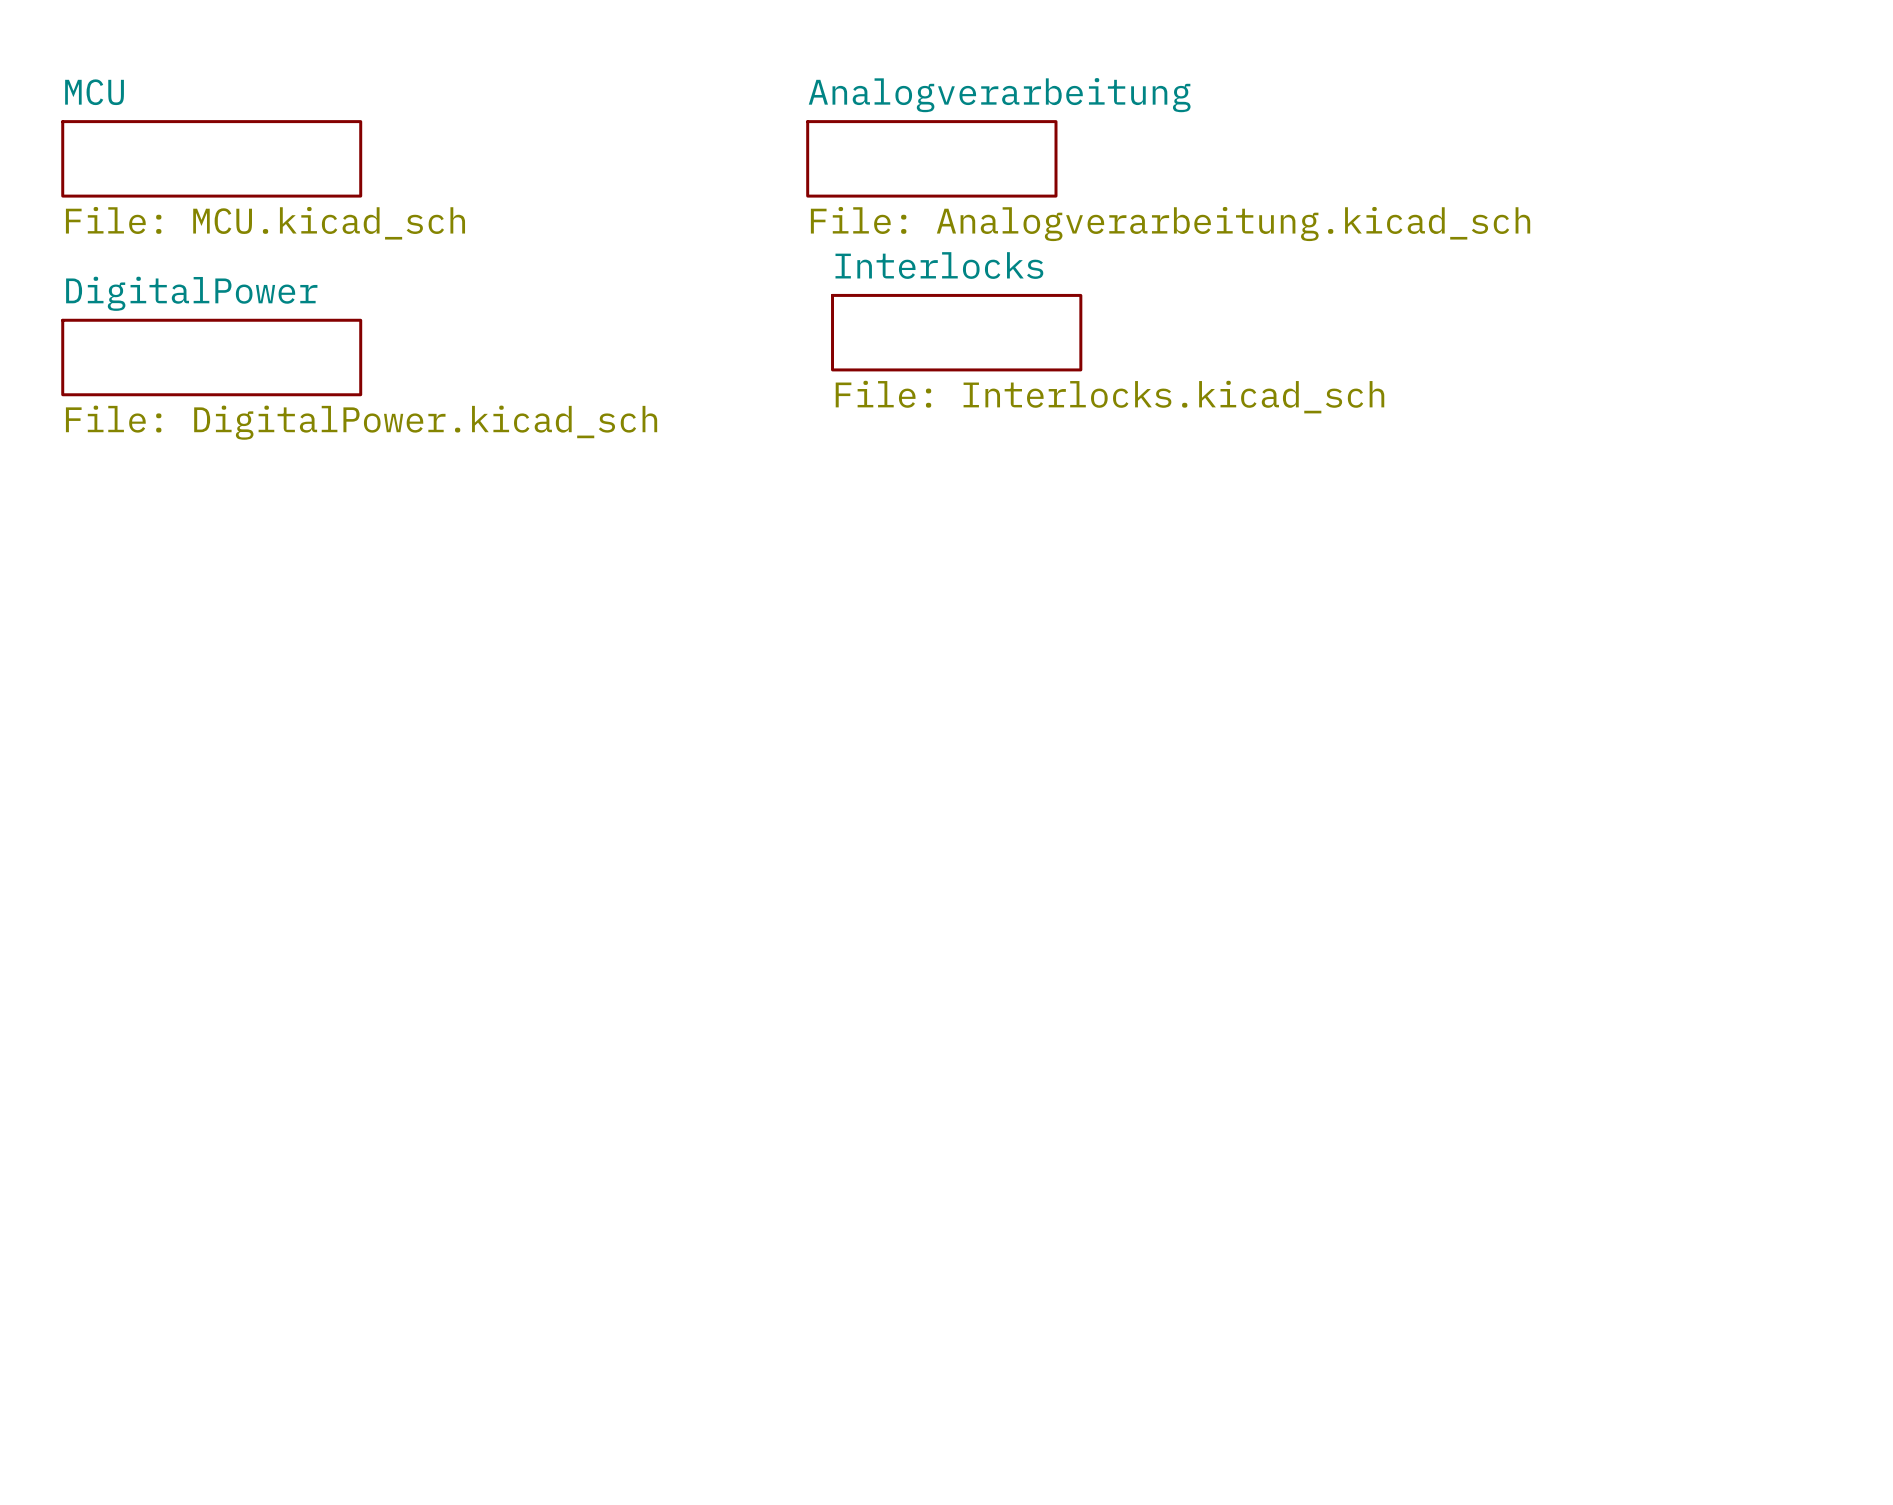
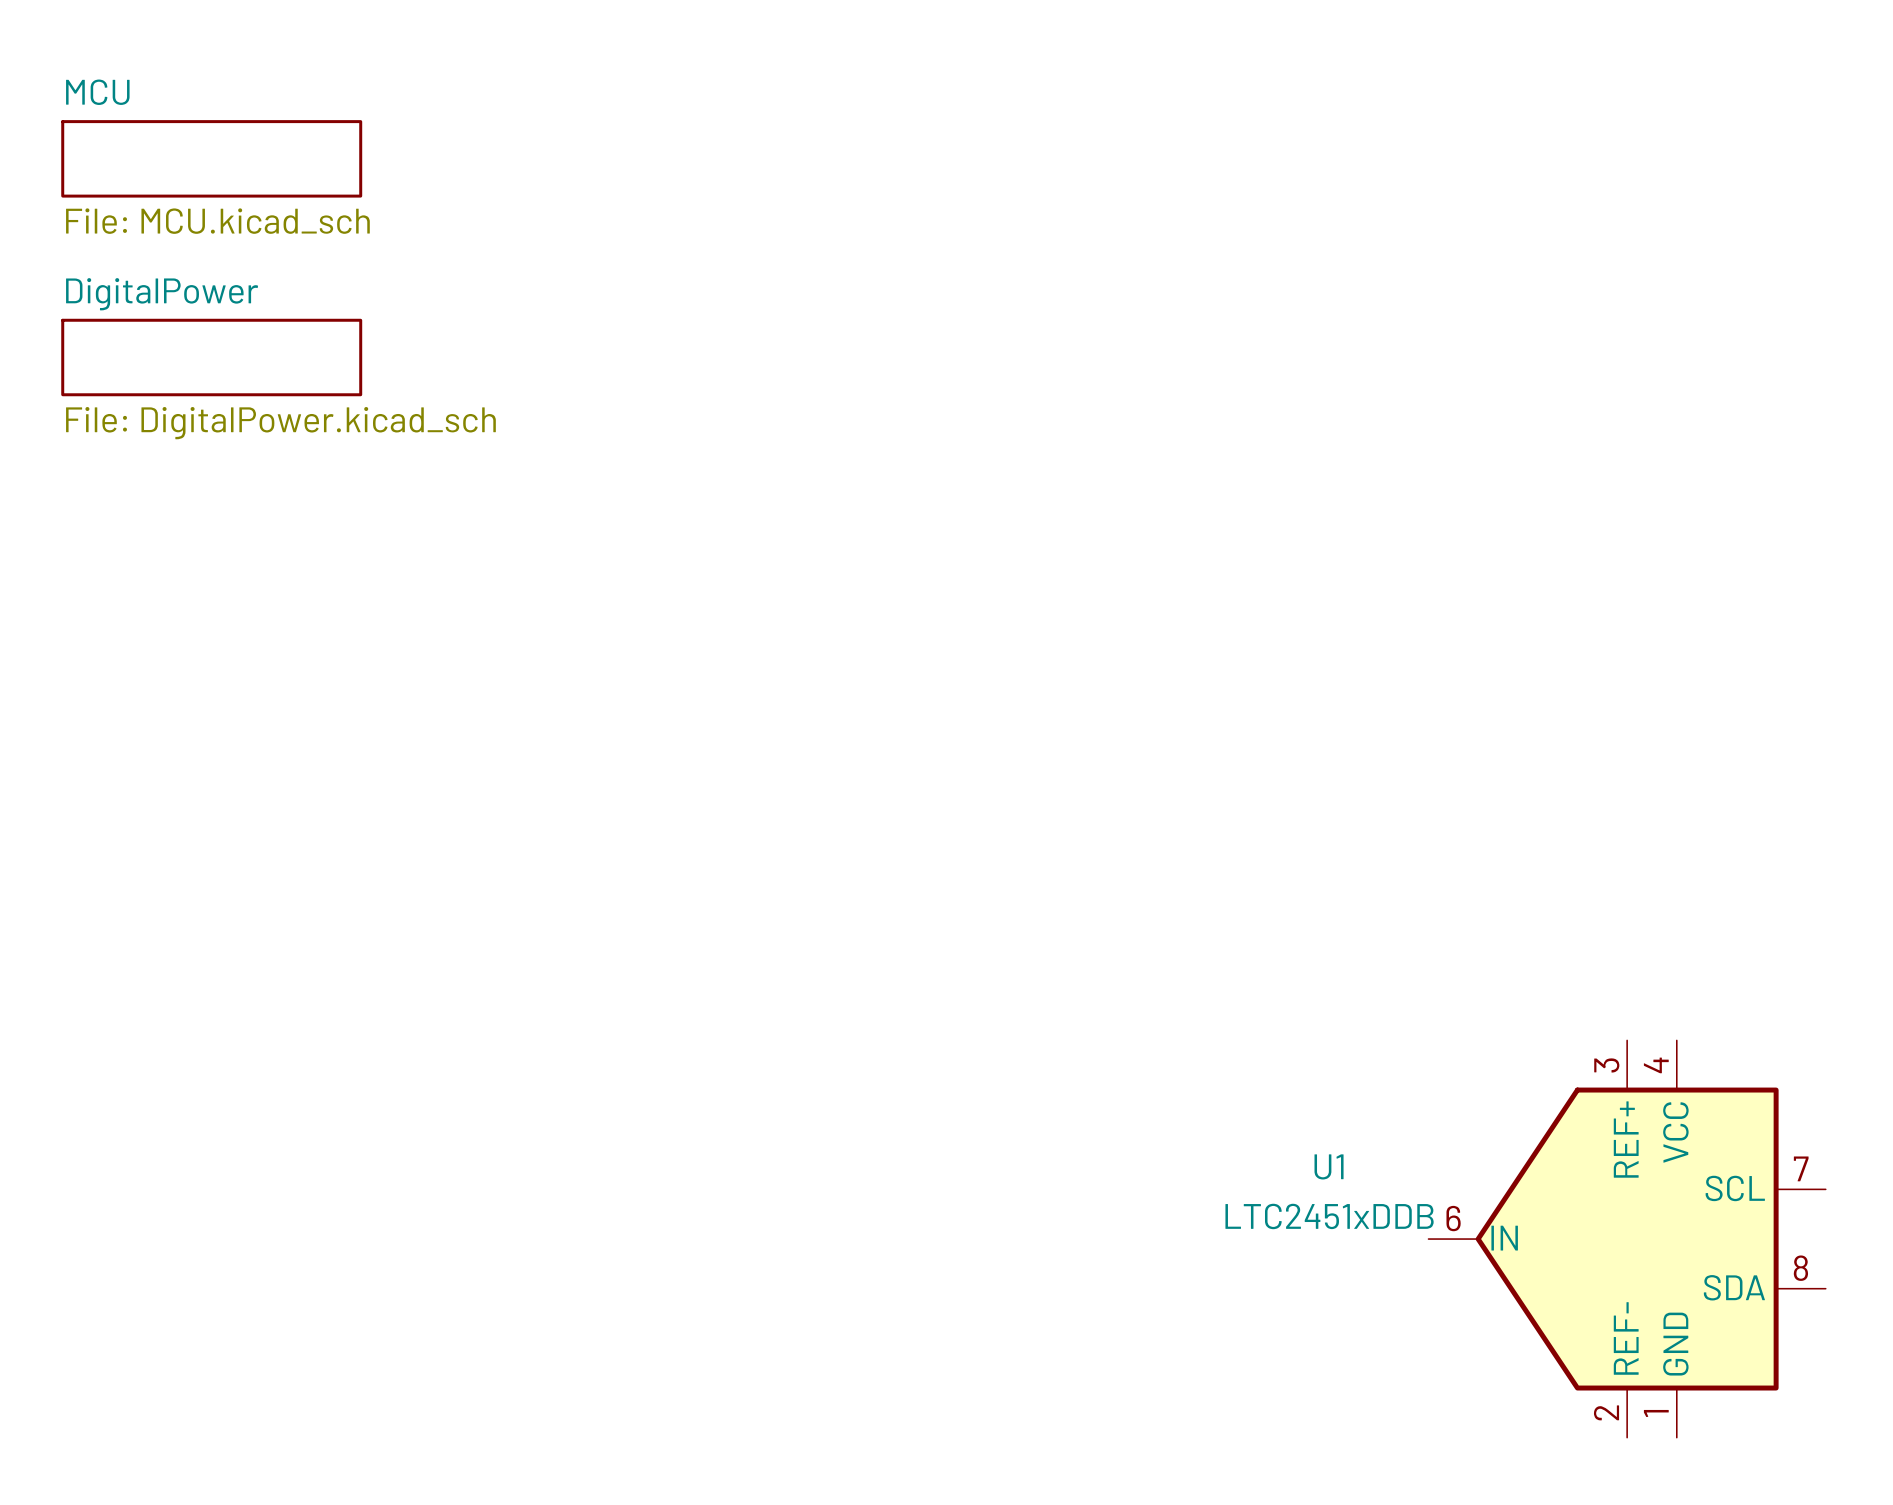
sheet Analogverarbeitung: File: Analogverarbeitung.kicad_sch (931, 158) -> none
sheet Interlocks: File: Interlocks.kicad_sch (956, 332) -> none
U1: none -> LTC2451xDDB (1627, 1239)

